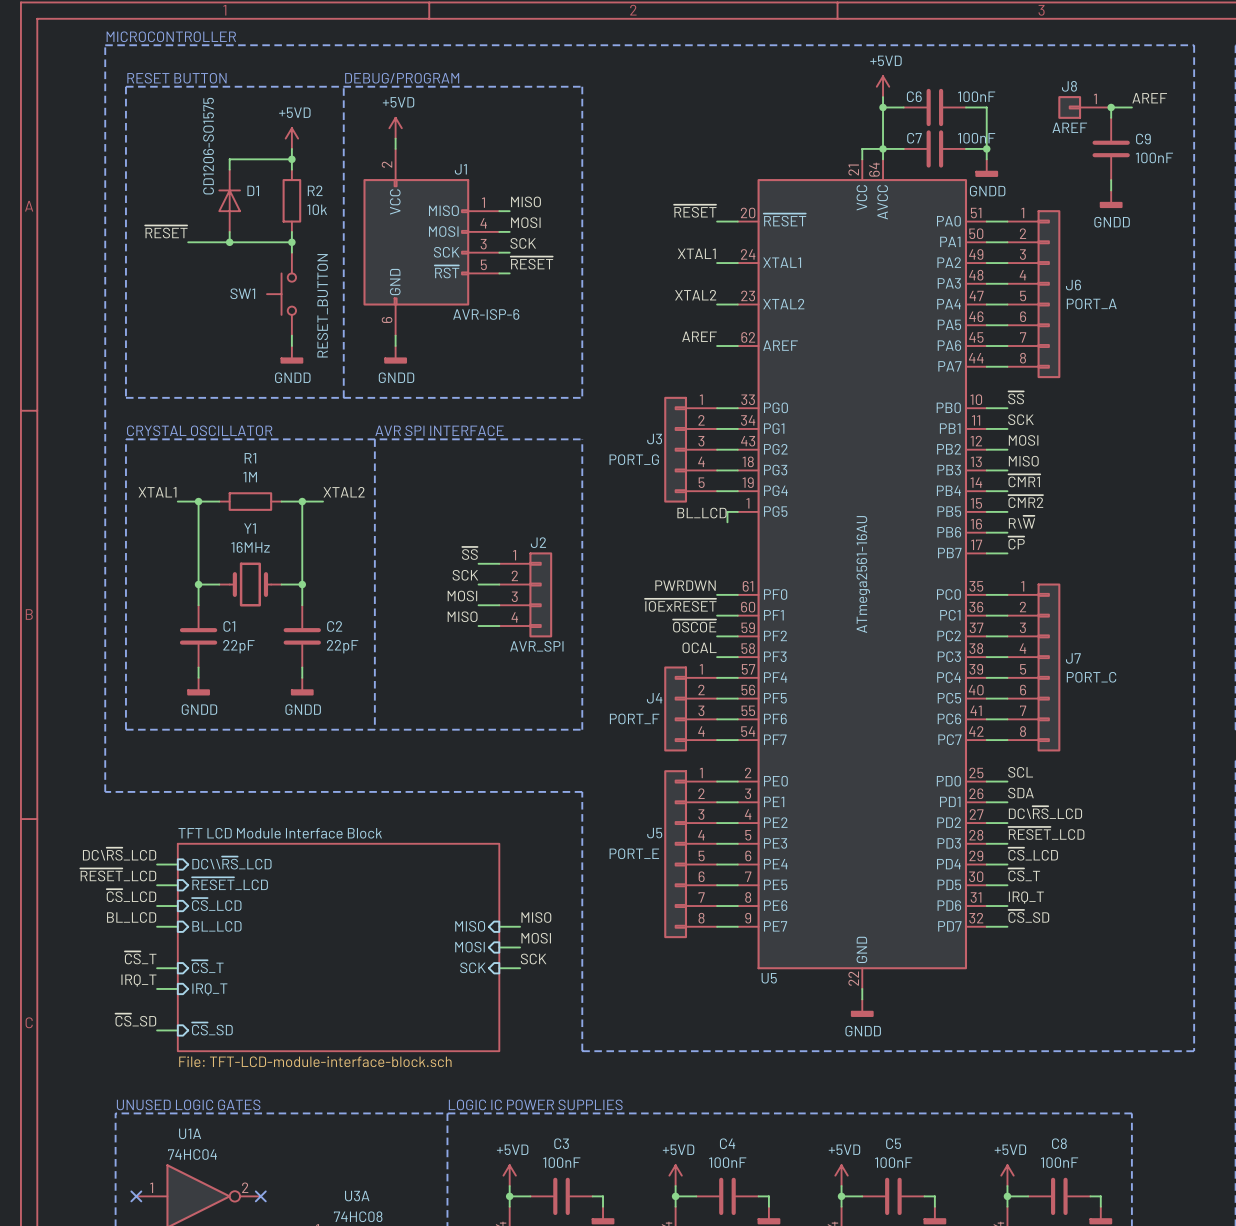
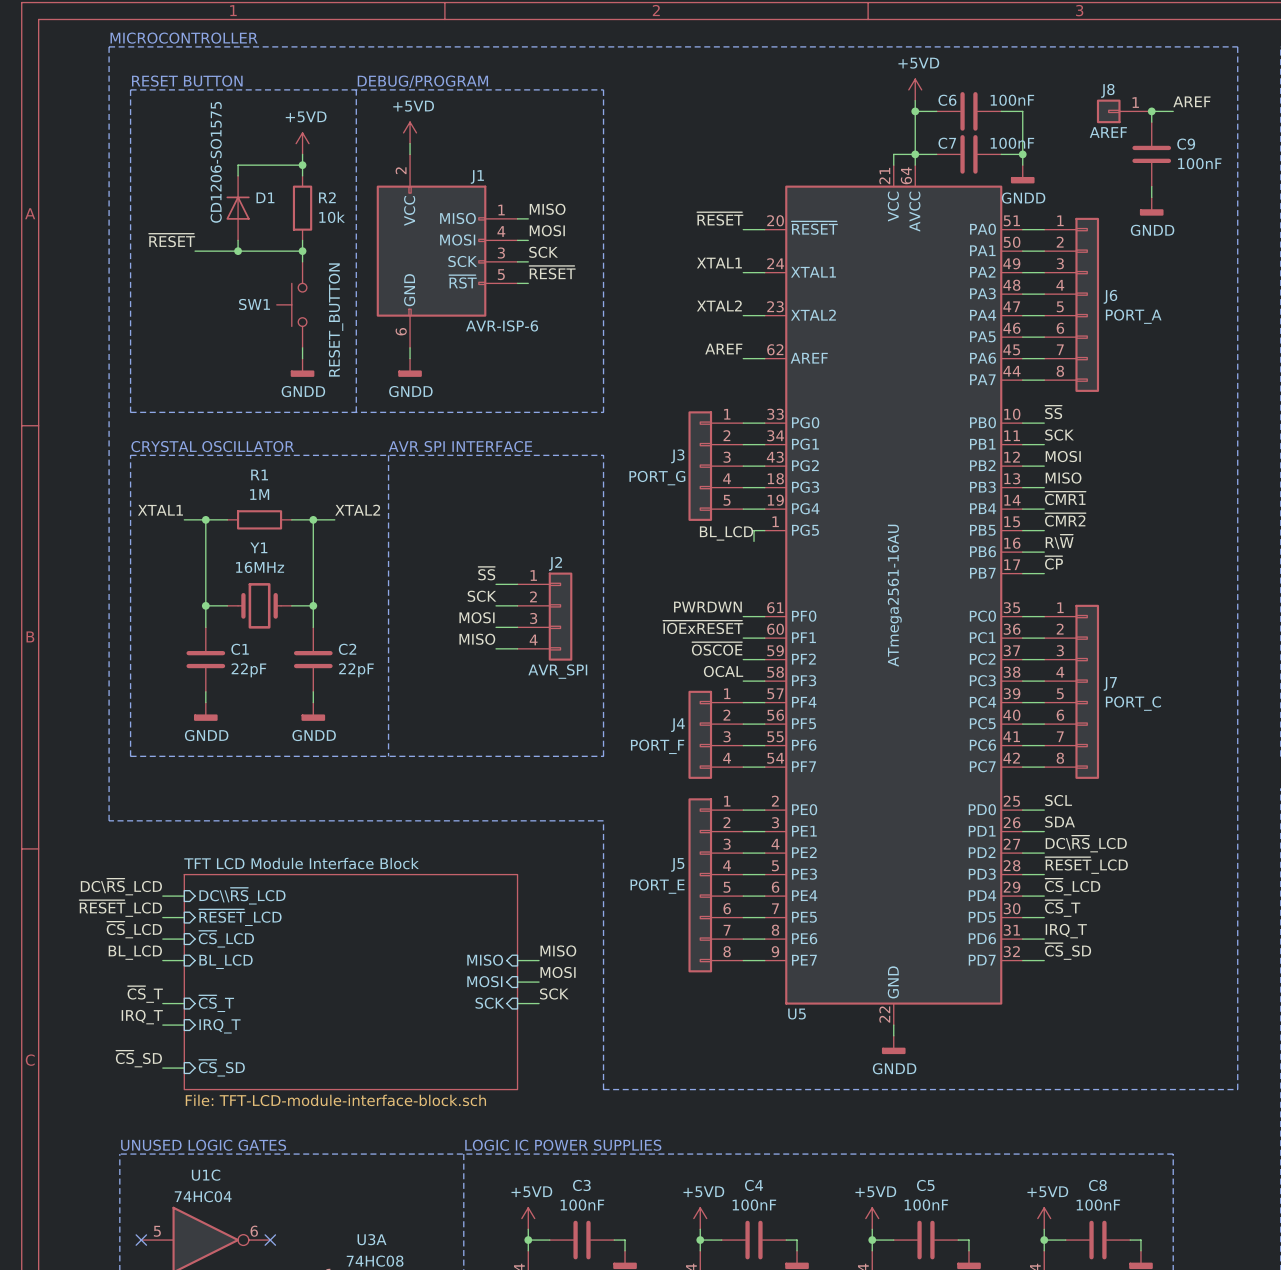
U1A name: U1A (190, 1133) -> U1C (206, 1175)
U1A pin number: 1 (151, 1187) -> 5 (157, 1231)
U1A pin number: 2 (245, 1187) -> 6 (254, 1231)

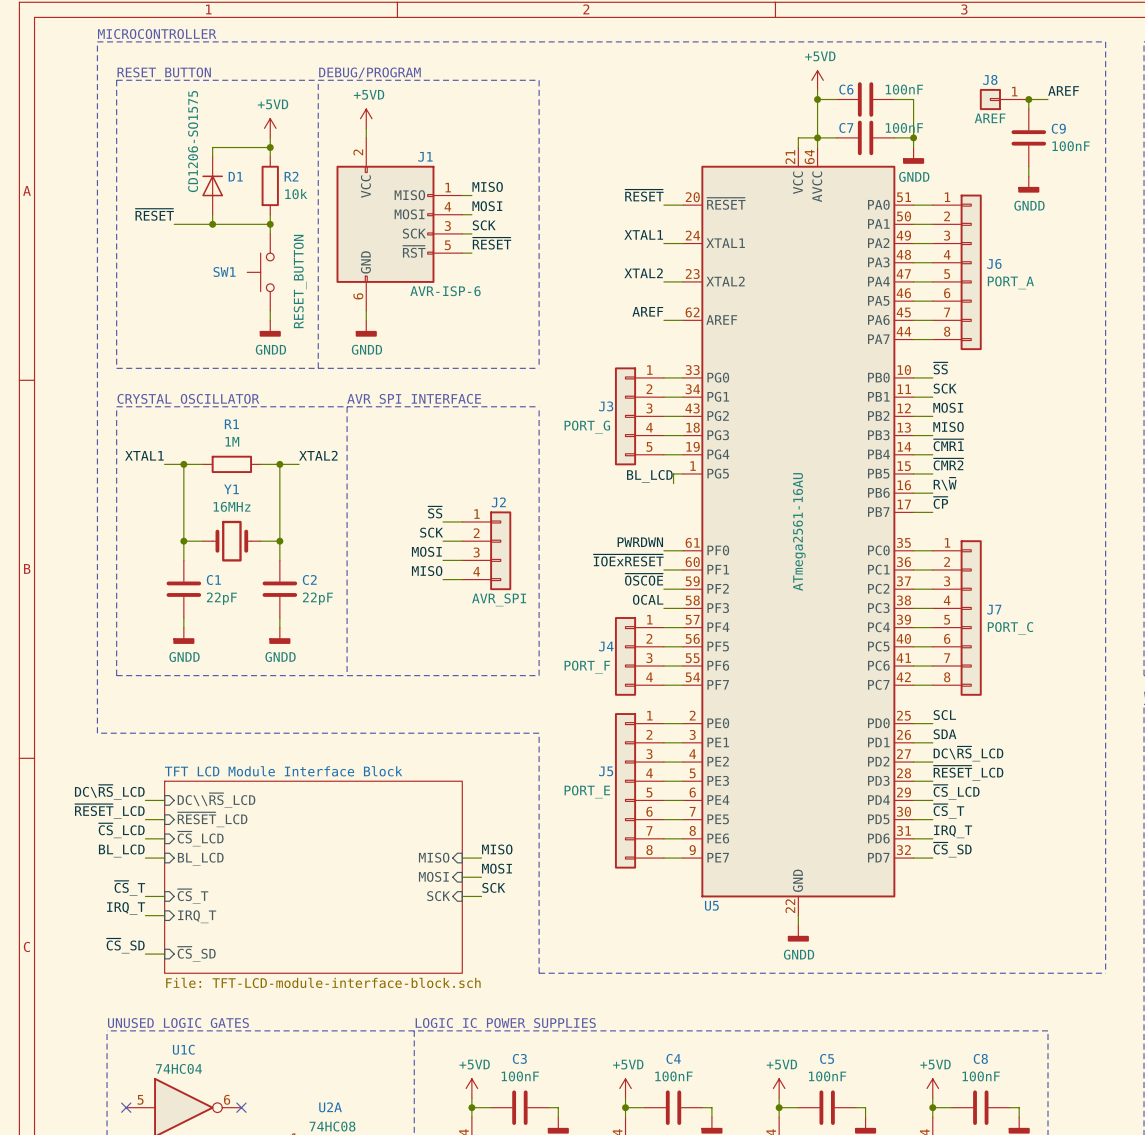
U3A name: U3A (372, 1239) -> U2A (330, 1107)

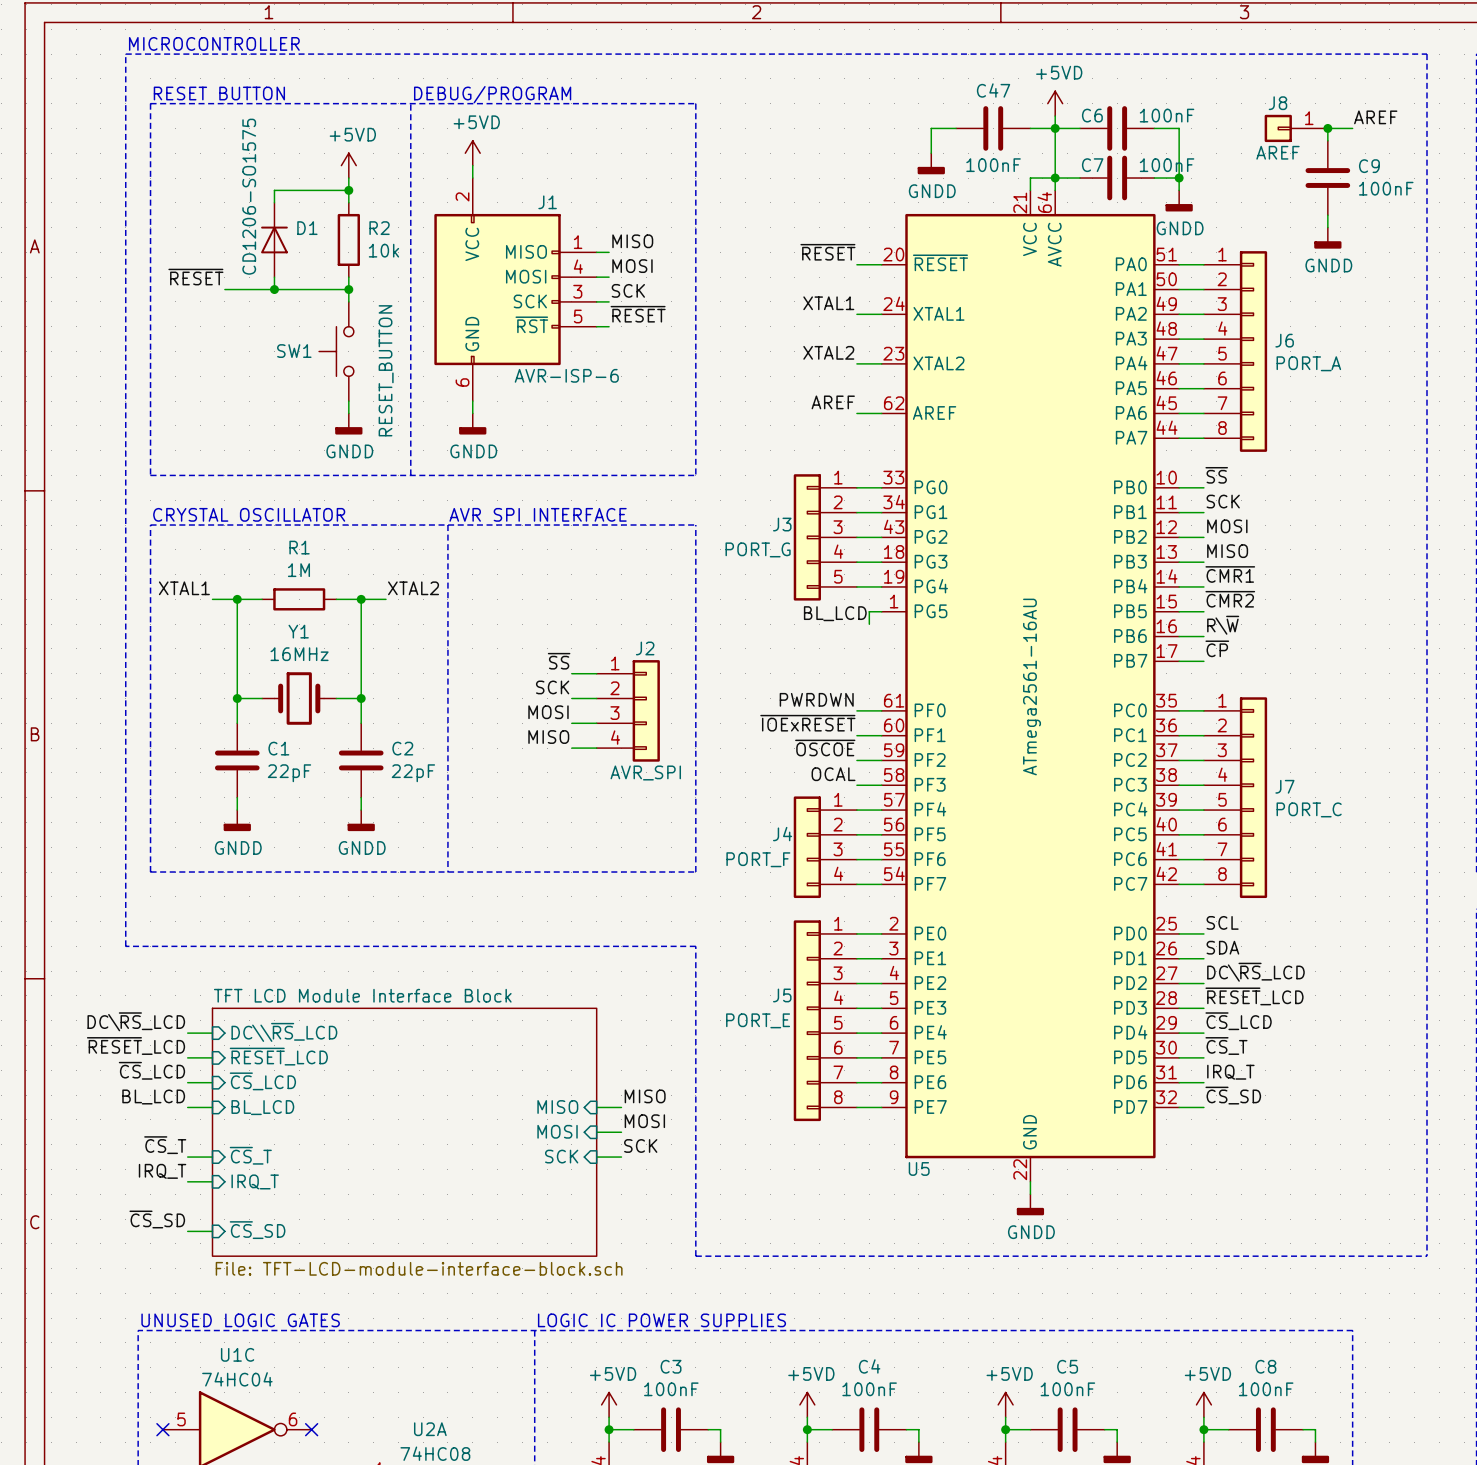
wire: none -> (956, 128) (931, 128) (931, 153)
C47: none -> 100nF (993, 128)
wire: none -> (1030, 128) (1055, 128)
power symbol: none -> GNDD (931, 163)

